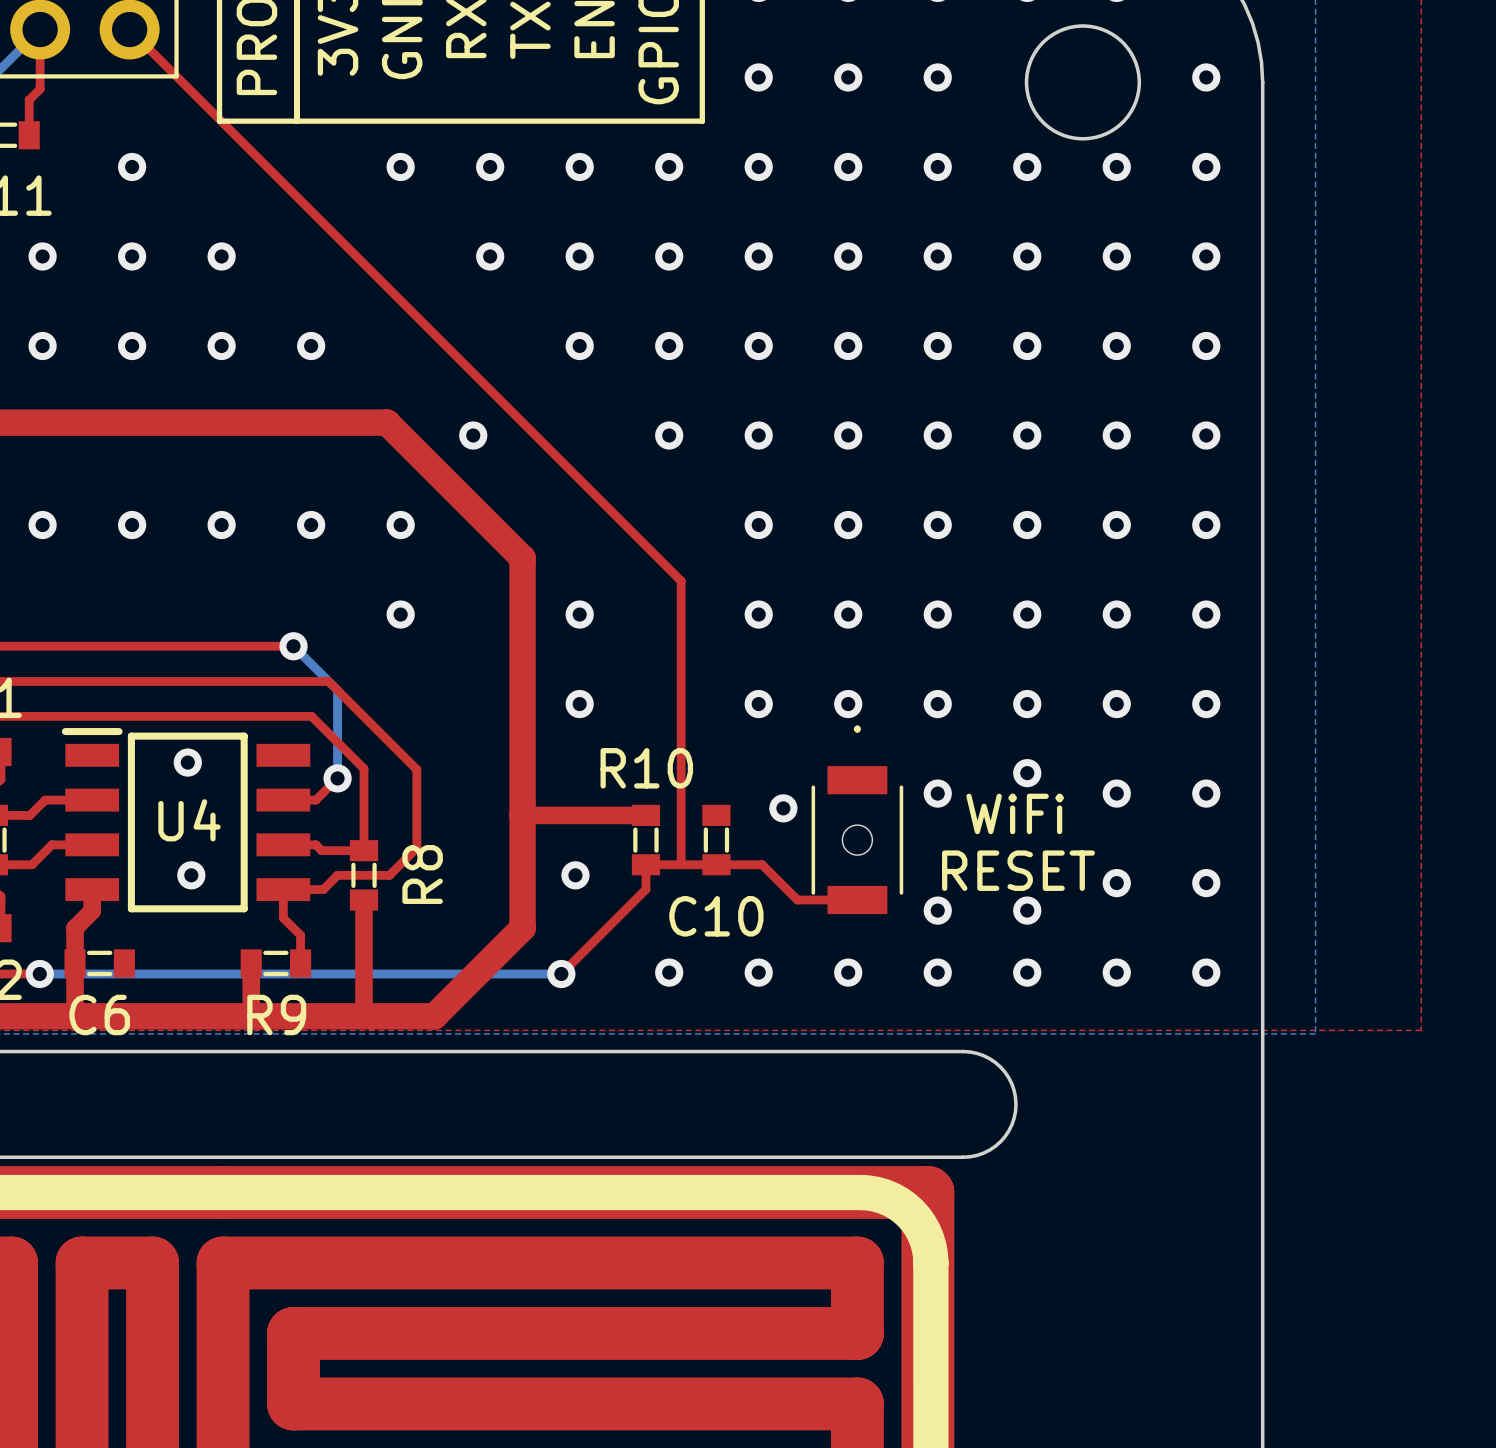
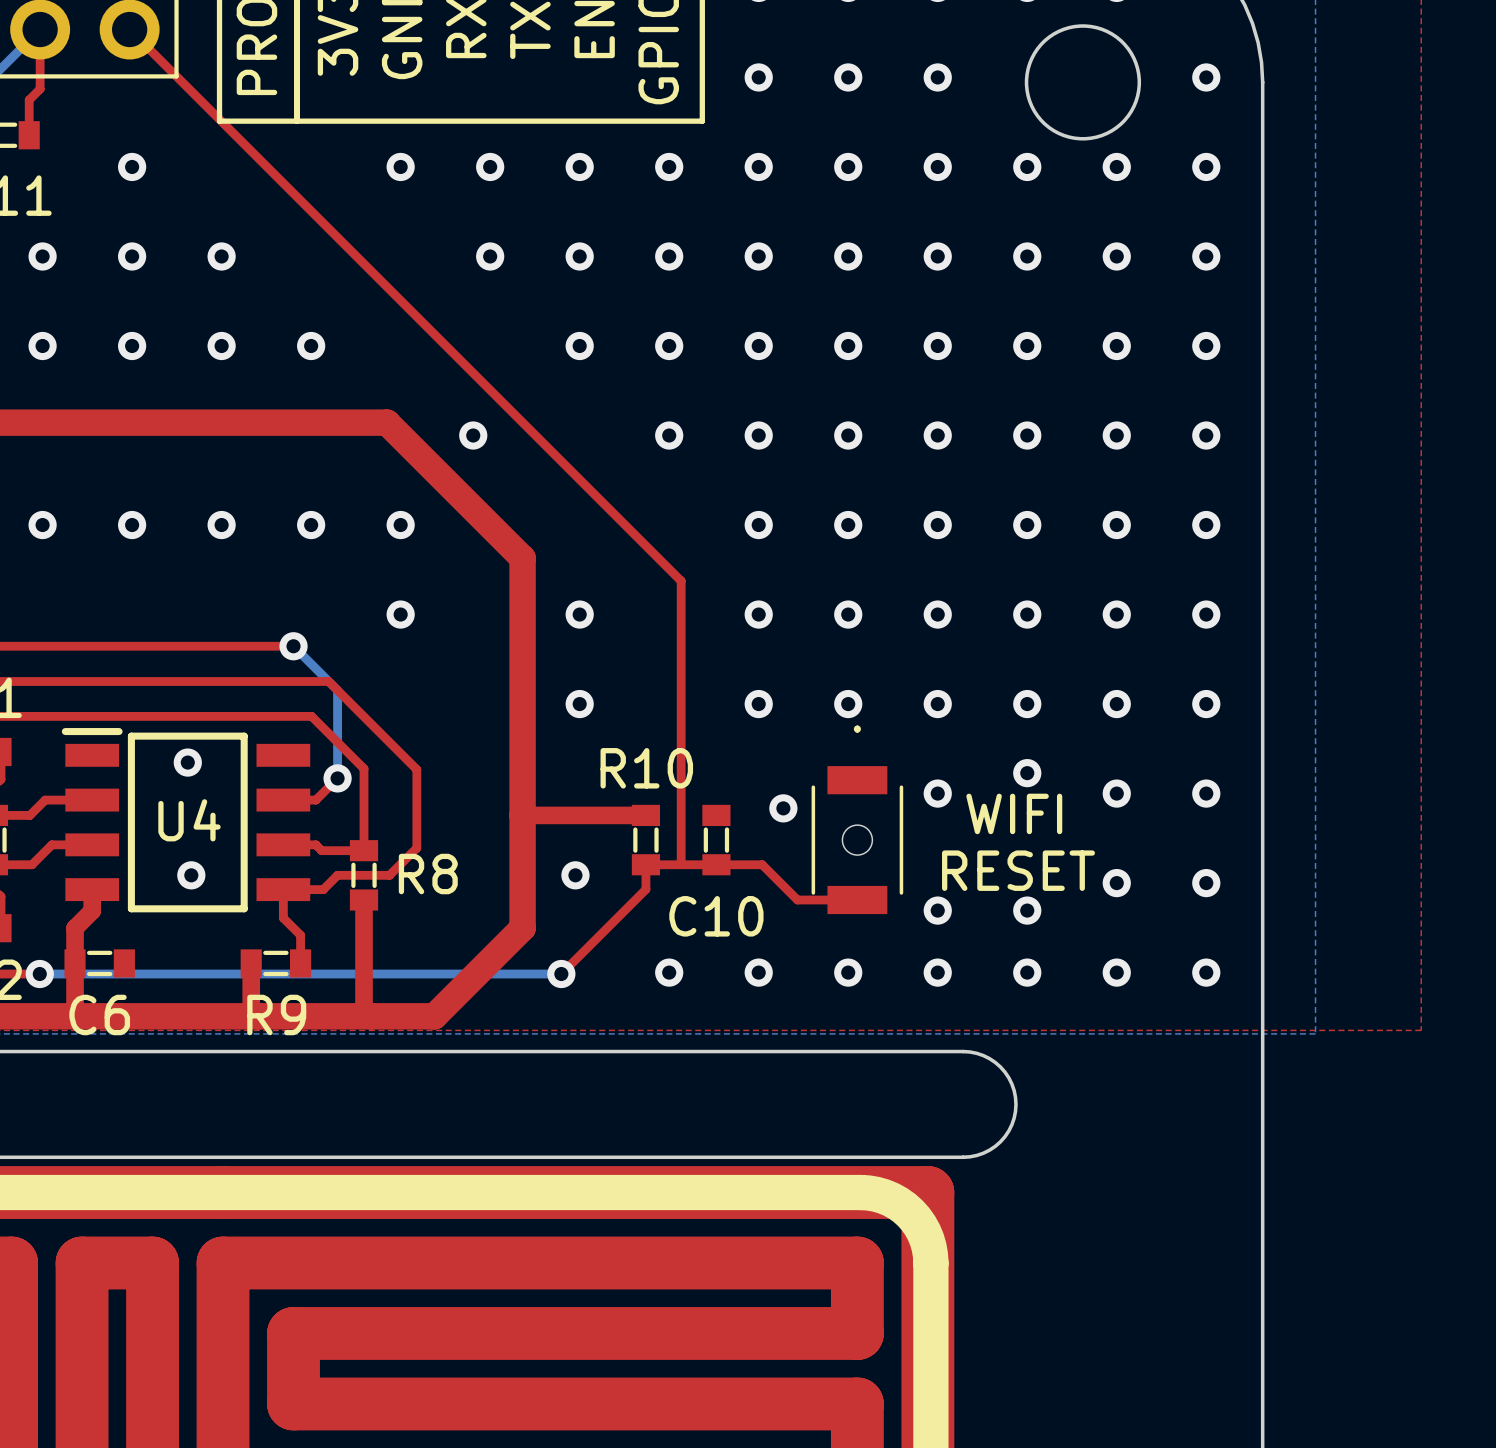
text: WiFi (1015, 813) -> WIFI (1014, 813)
R8 name rotation: 0° (422, 874) -> 90° clockwise (428, 874)

